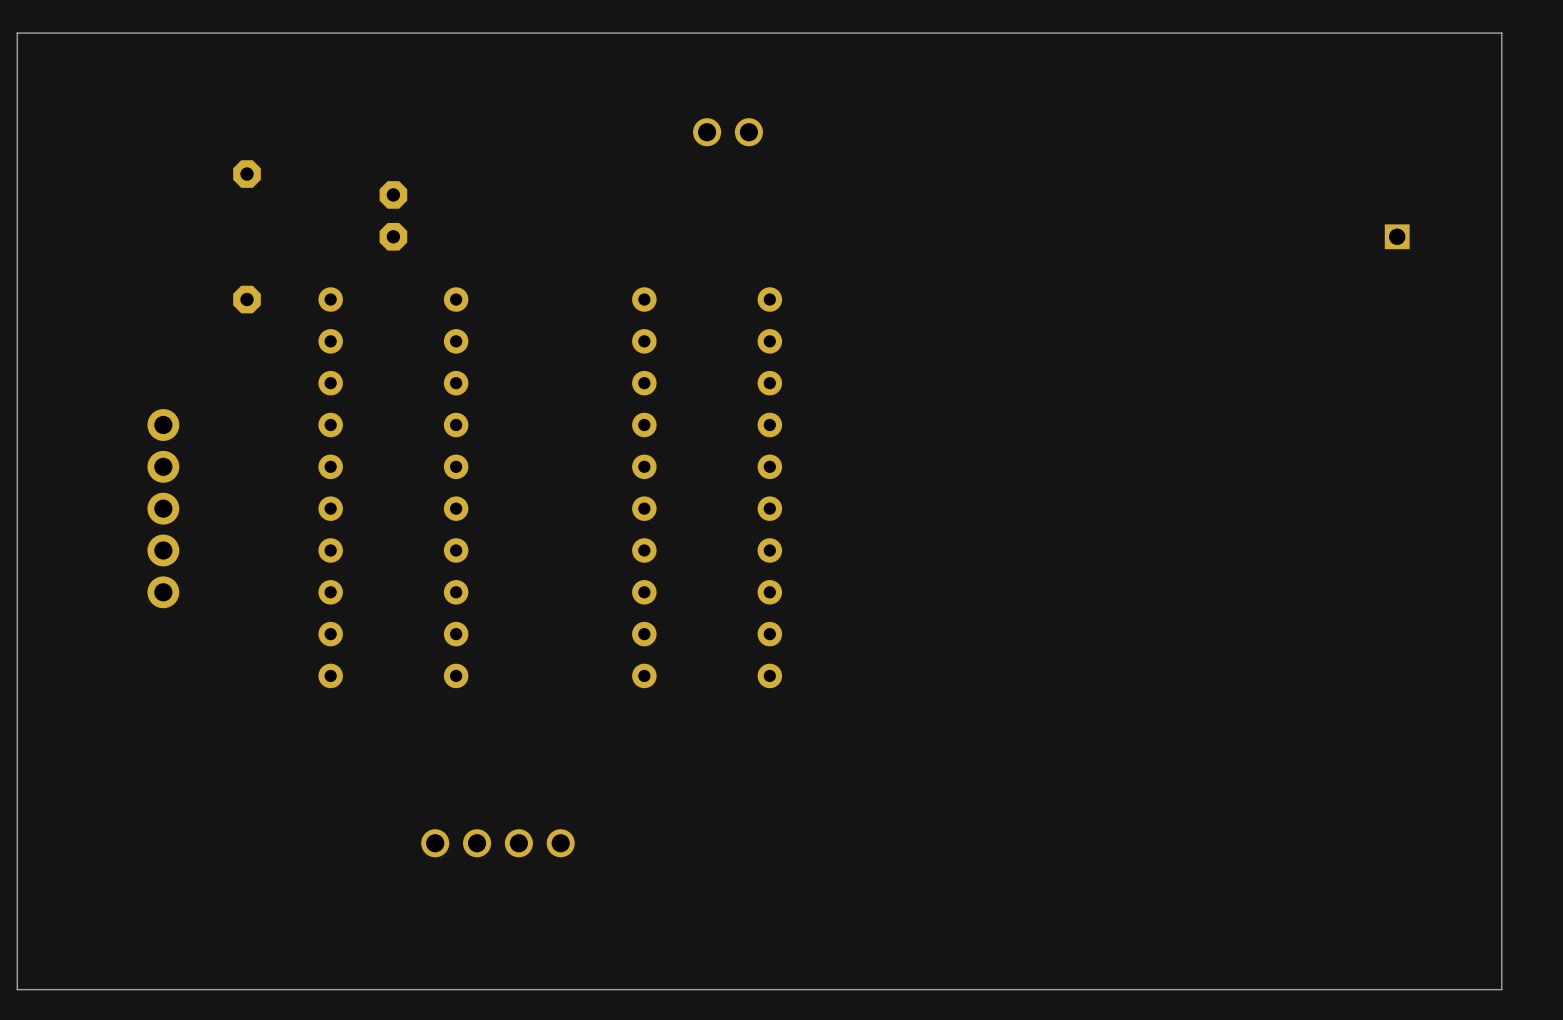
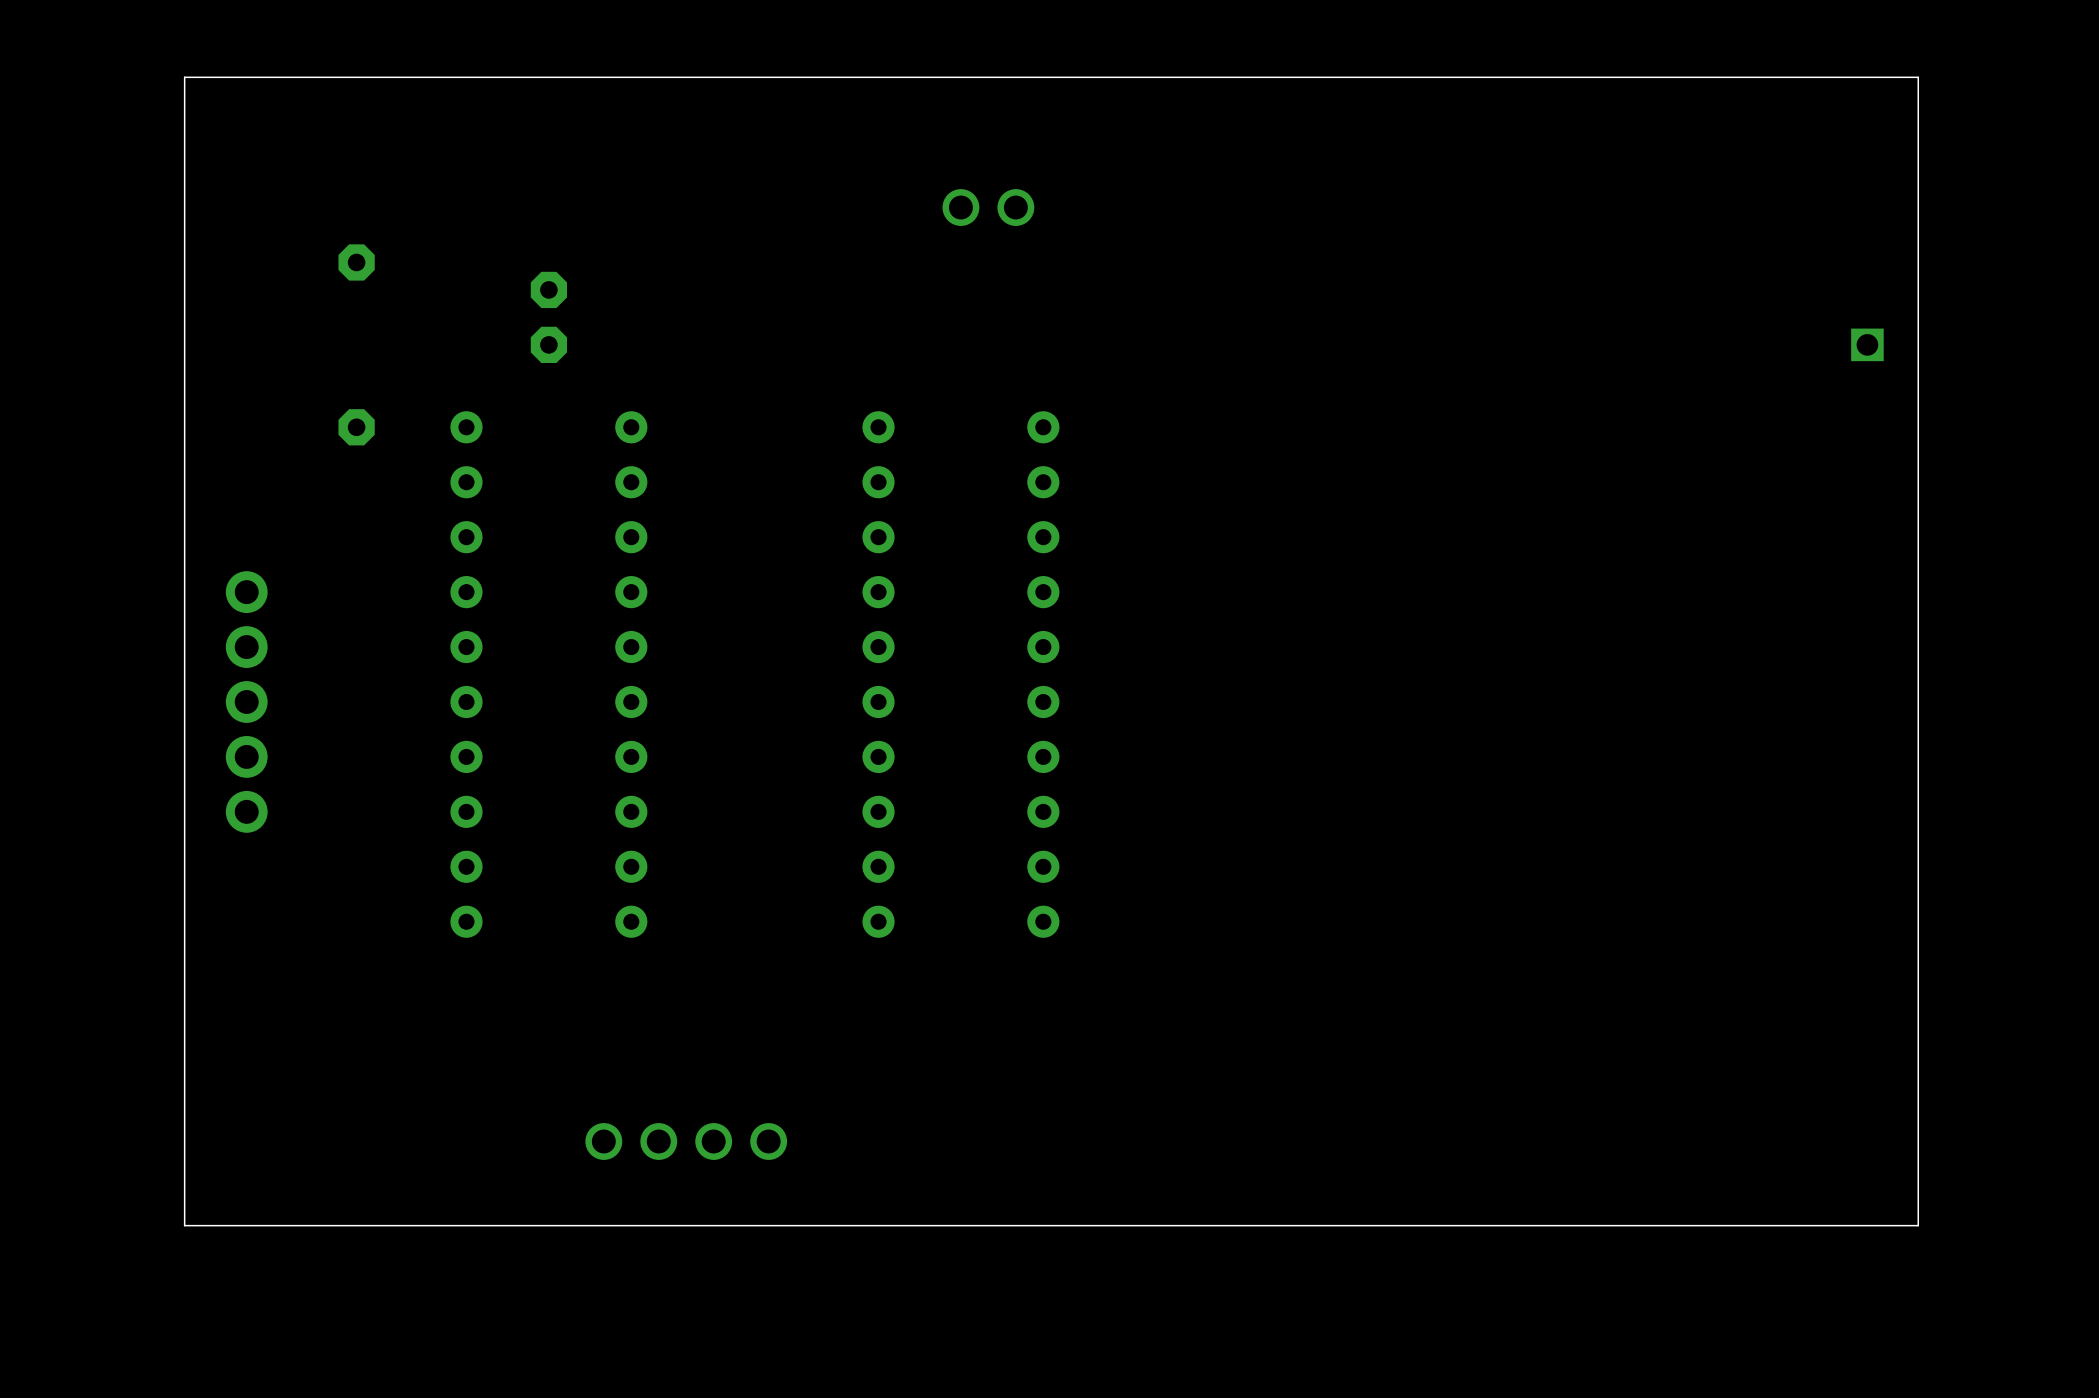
board edge: (1435, 33) (1501, 33) (1501, 989) (17, 989) (17, 33) (116, 33) -> (1918, 77) (1918, 1225) (184, 1225) (184, 77)

